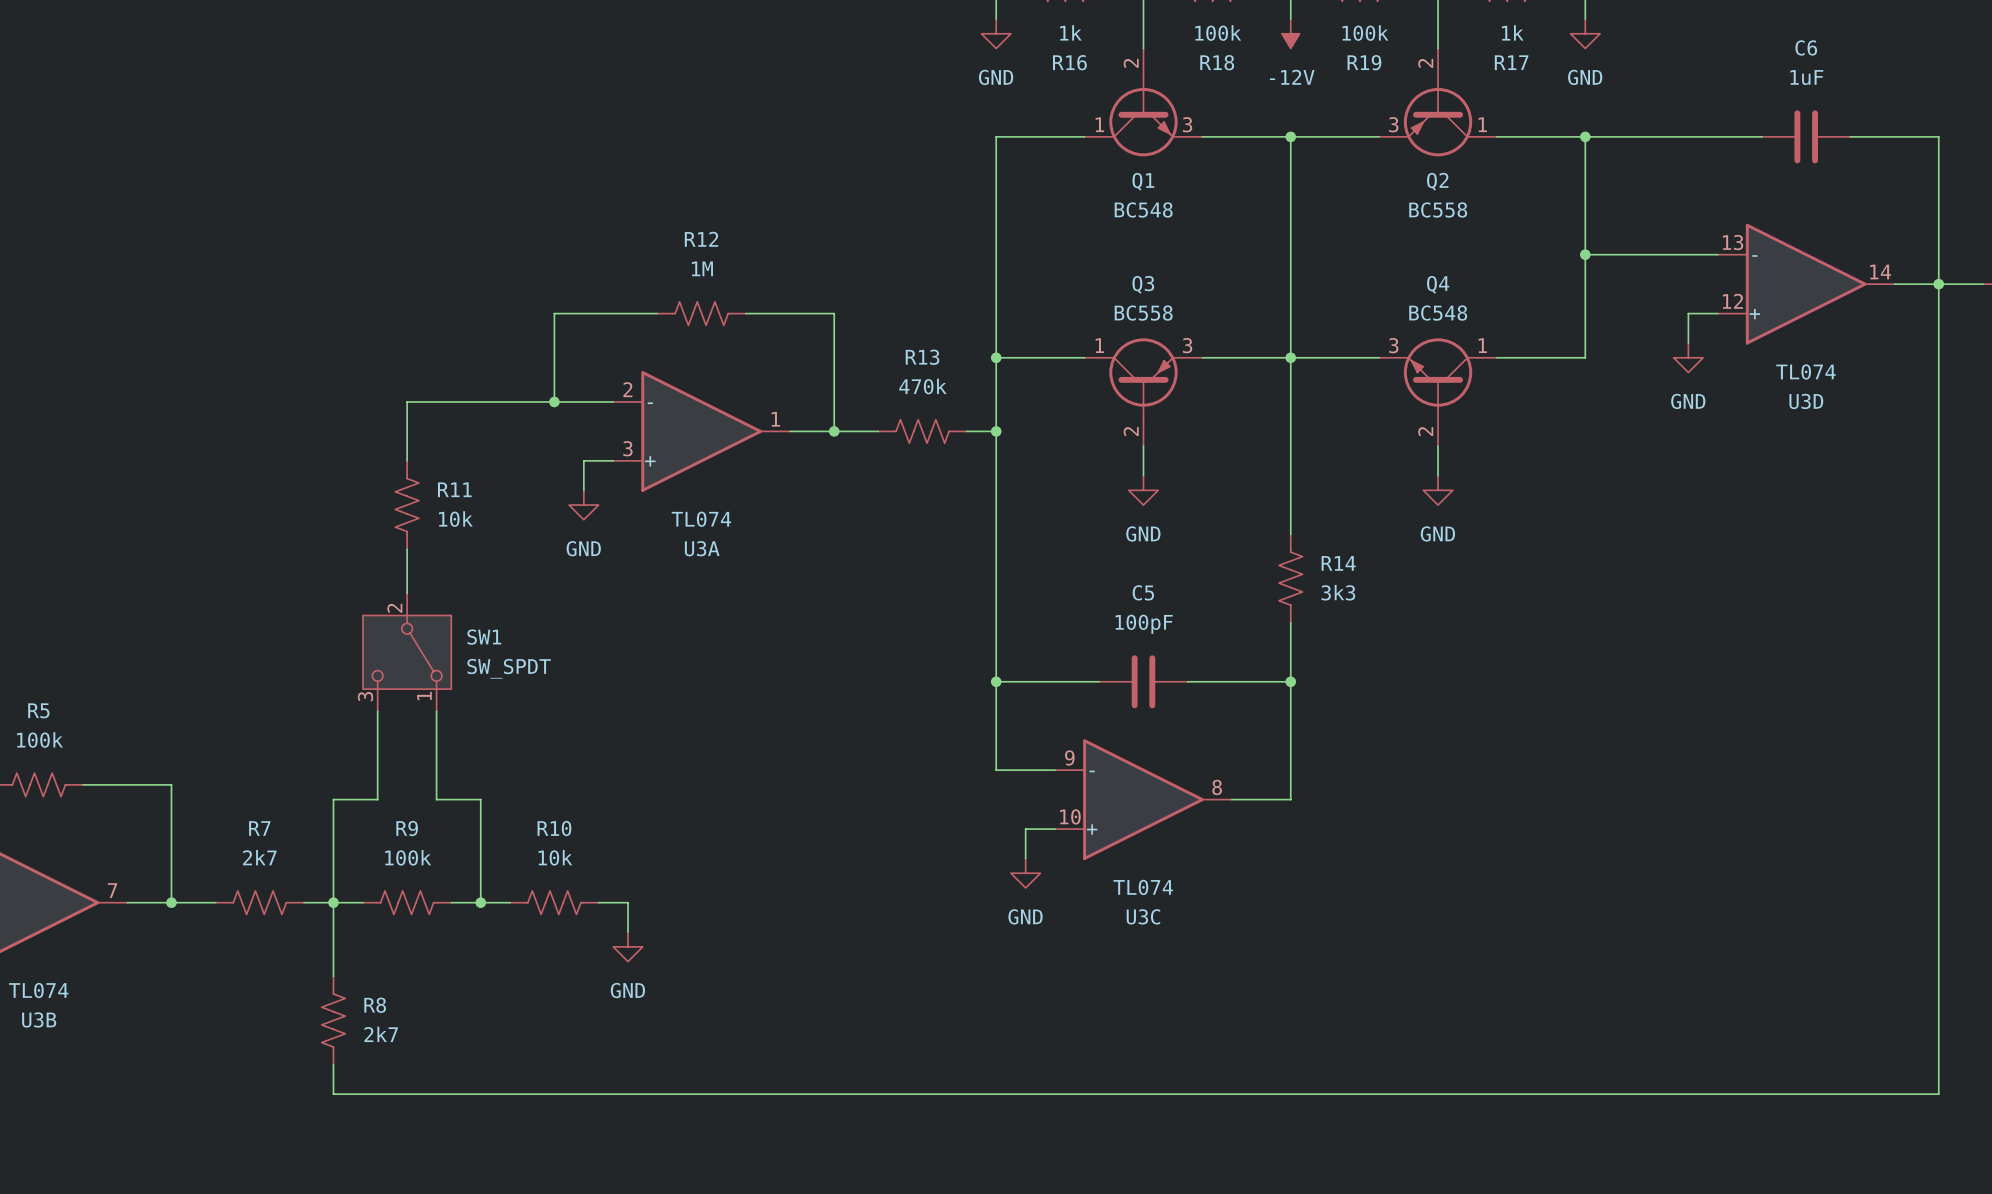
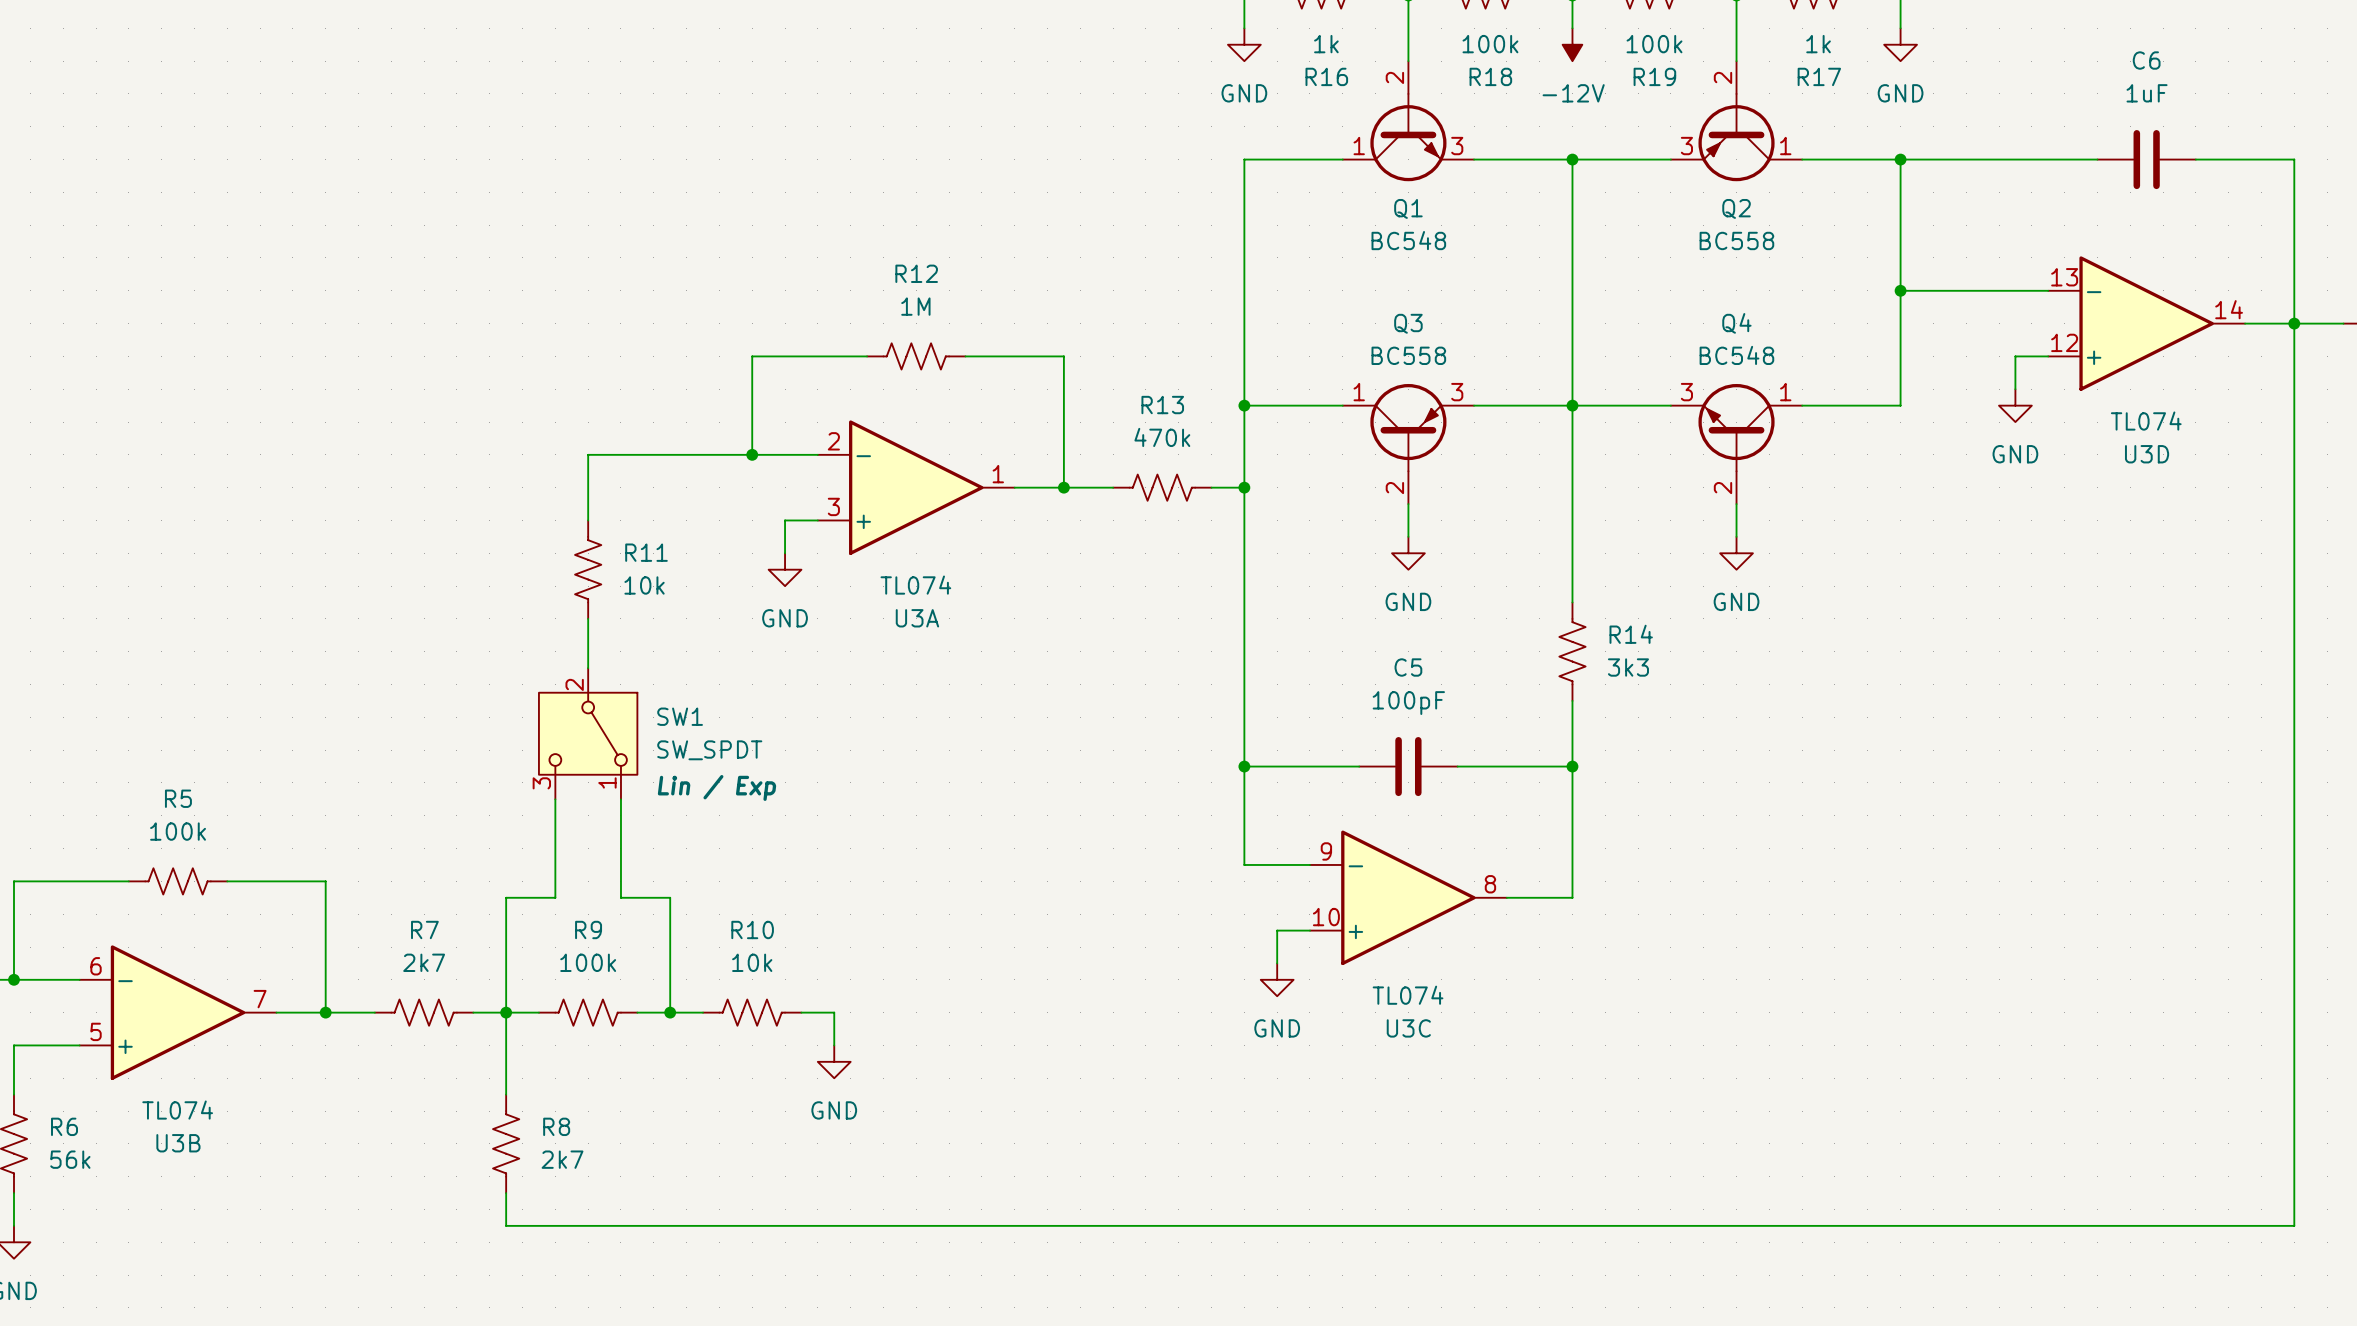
SW1 text: none -> Lin / Exp (717, 787)

